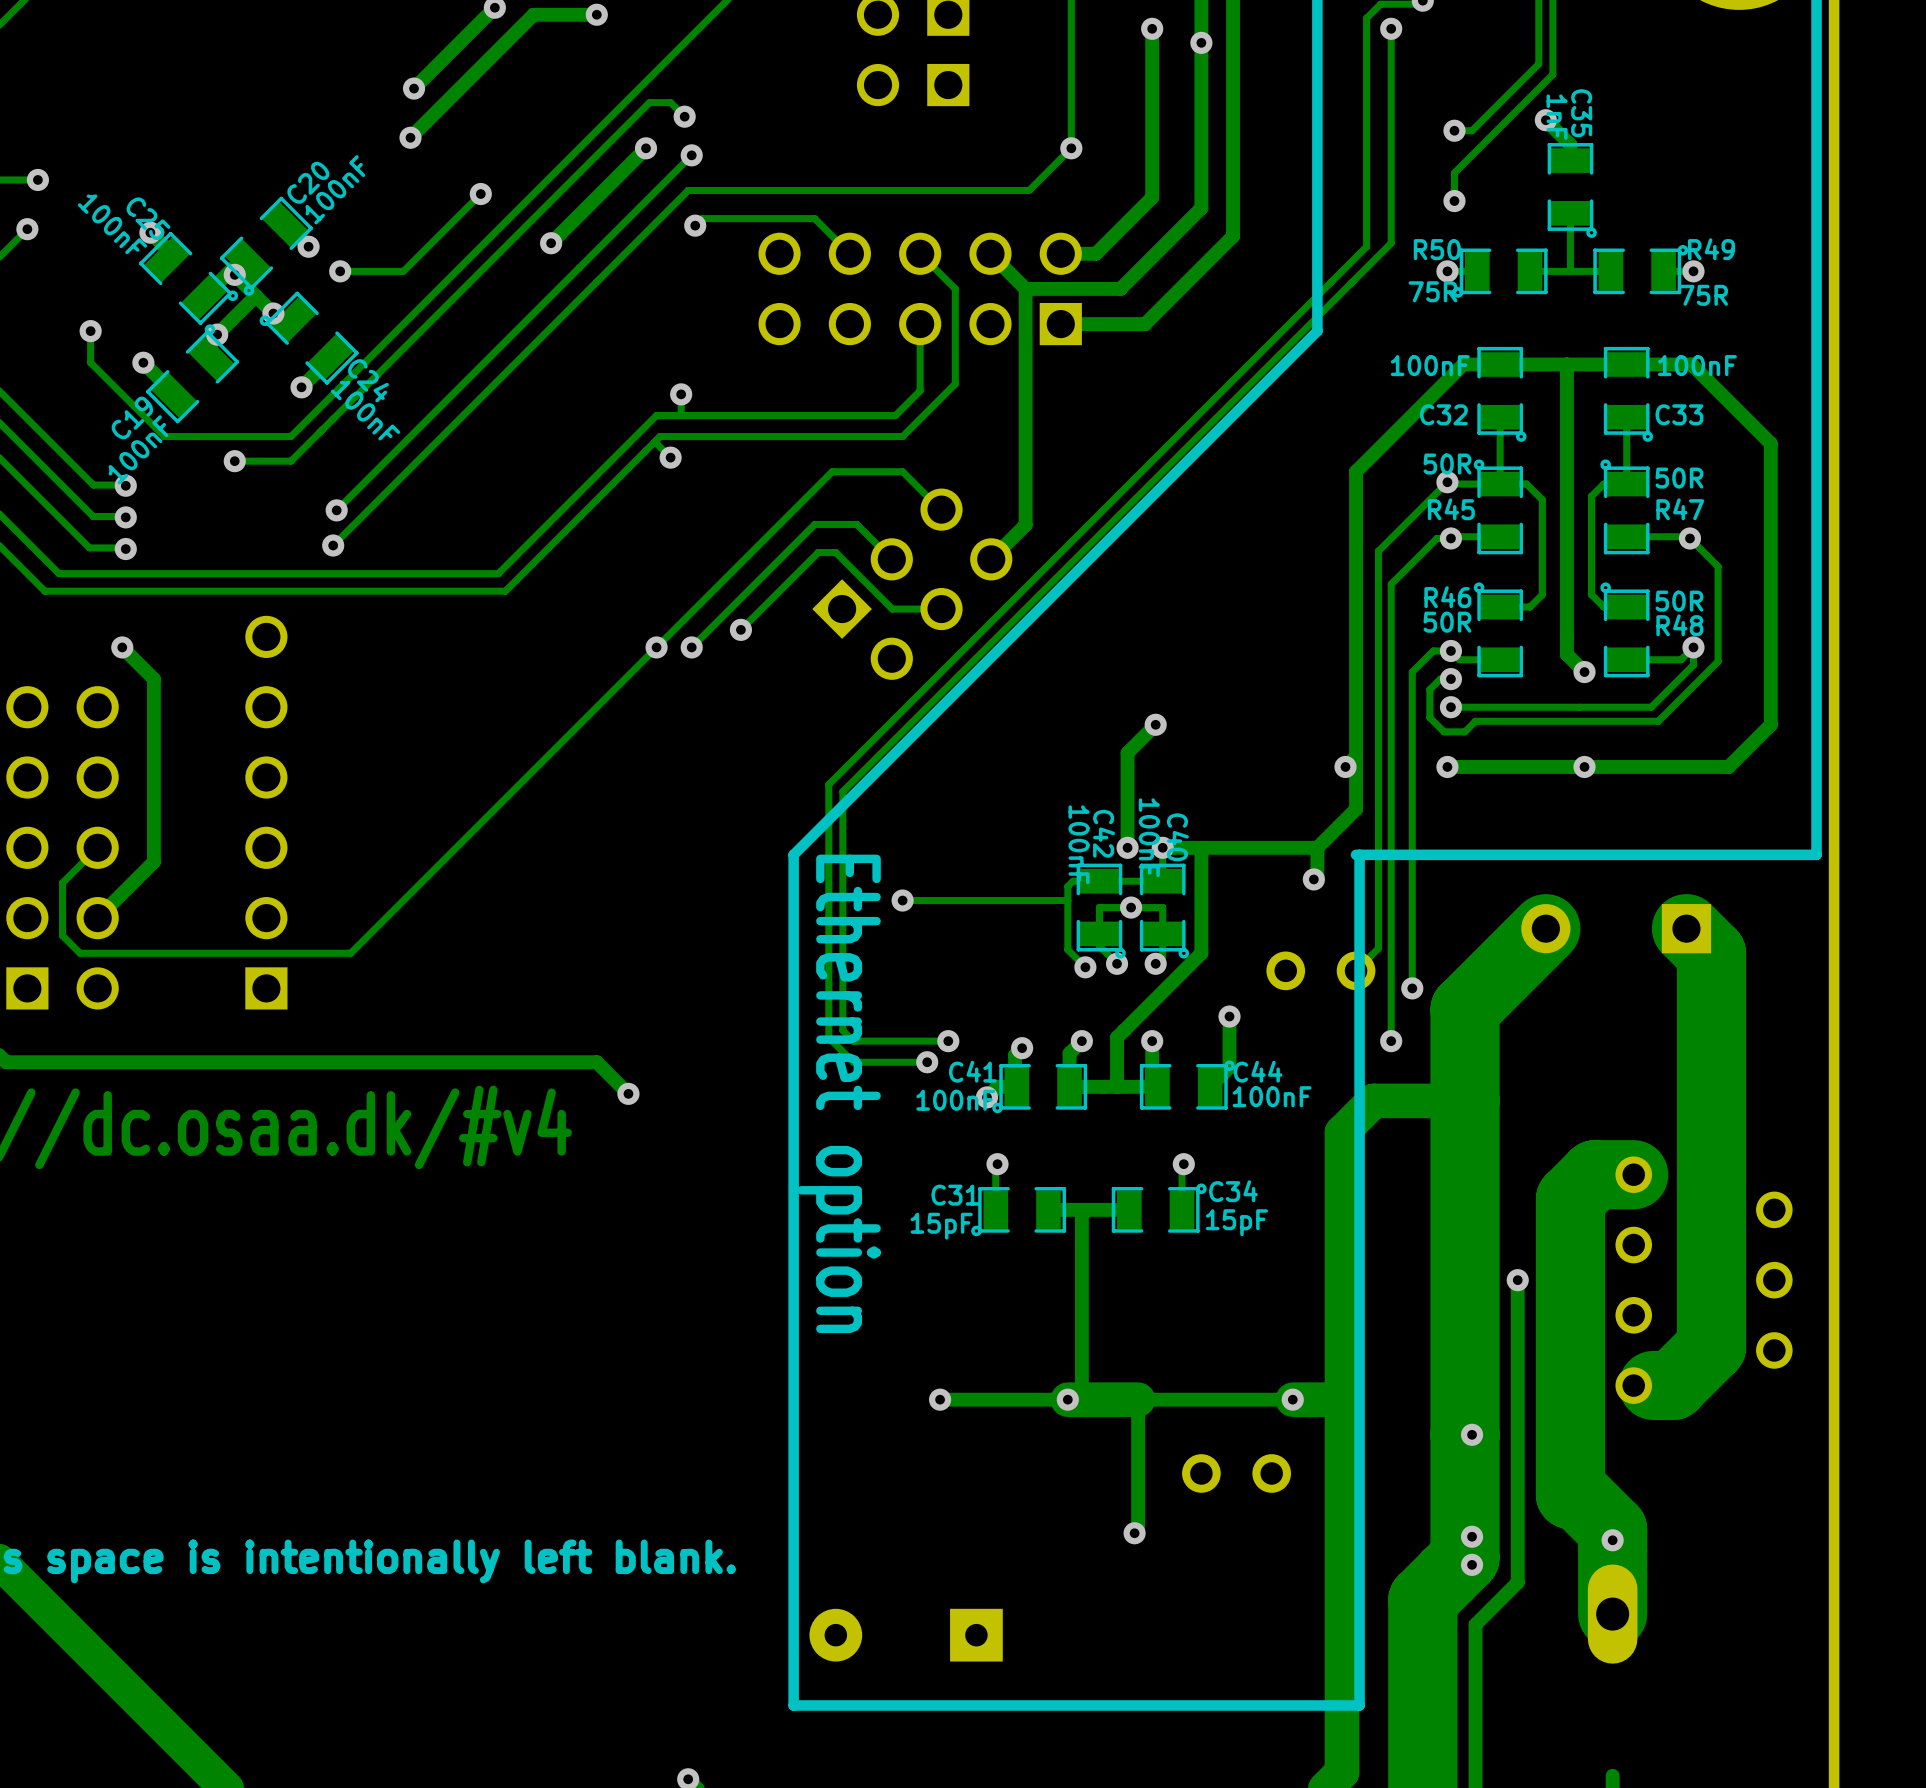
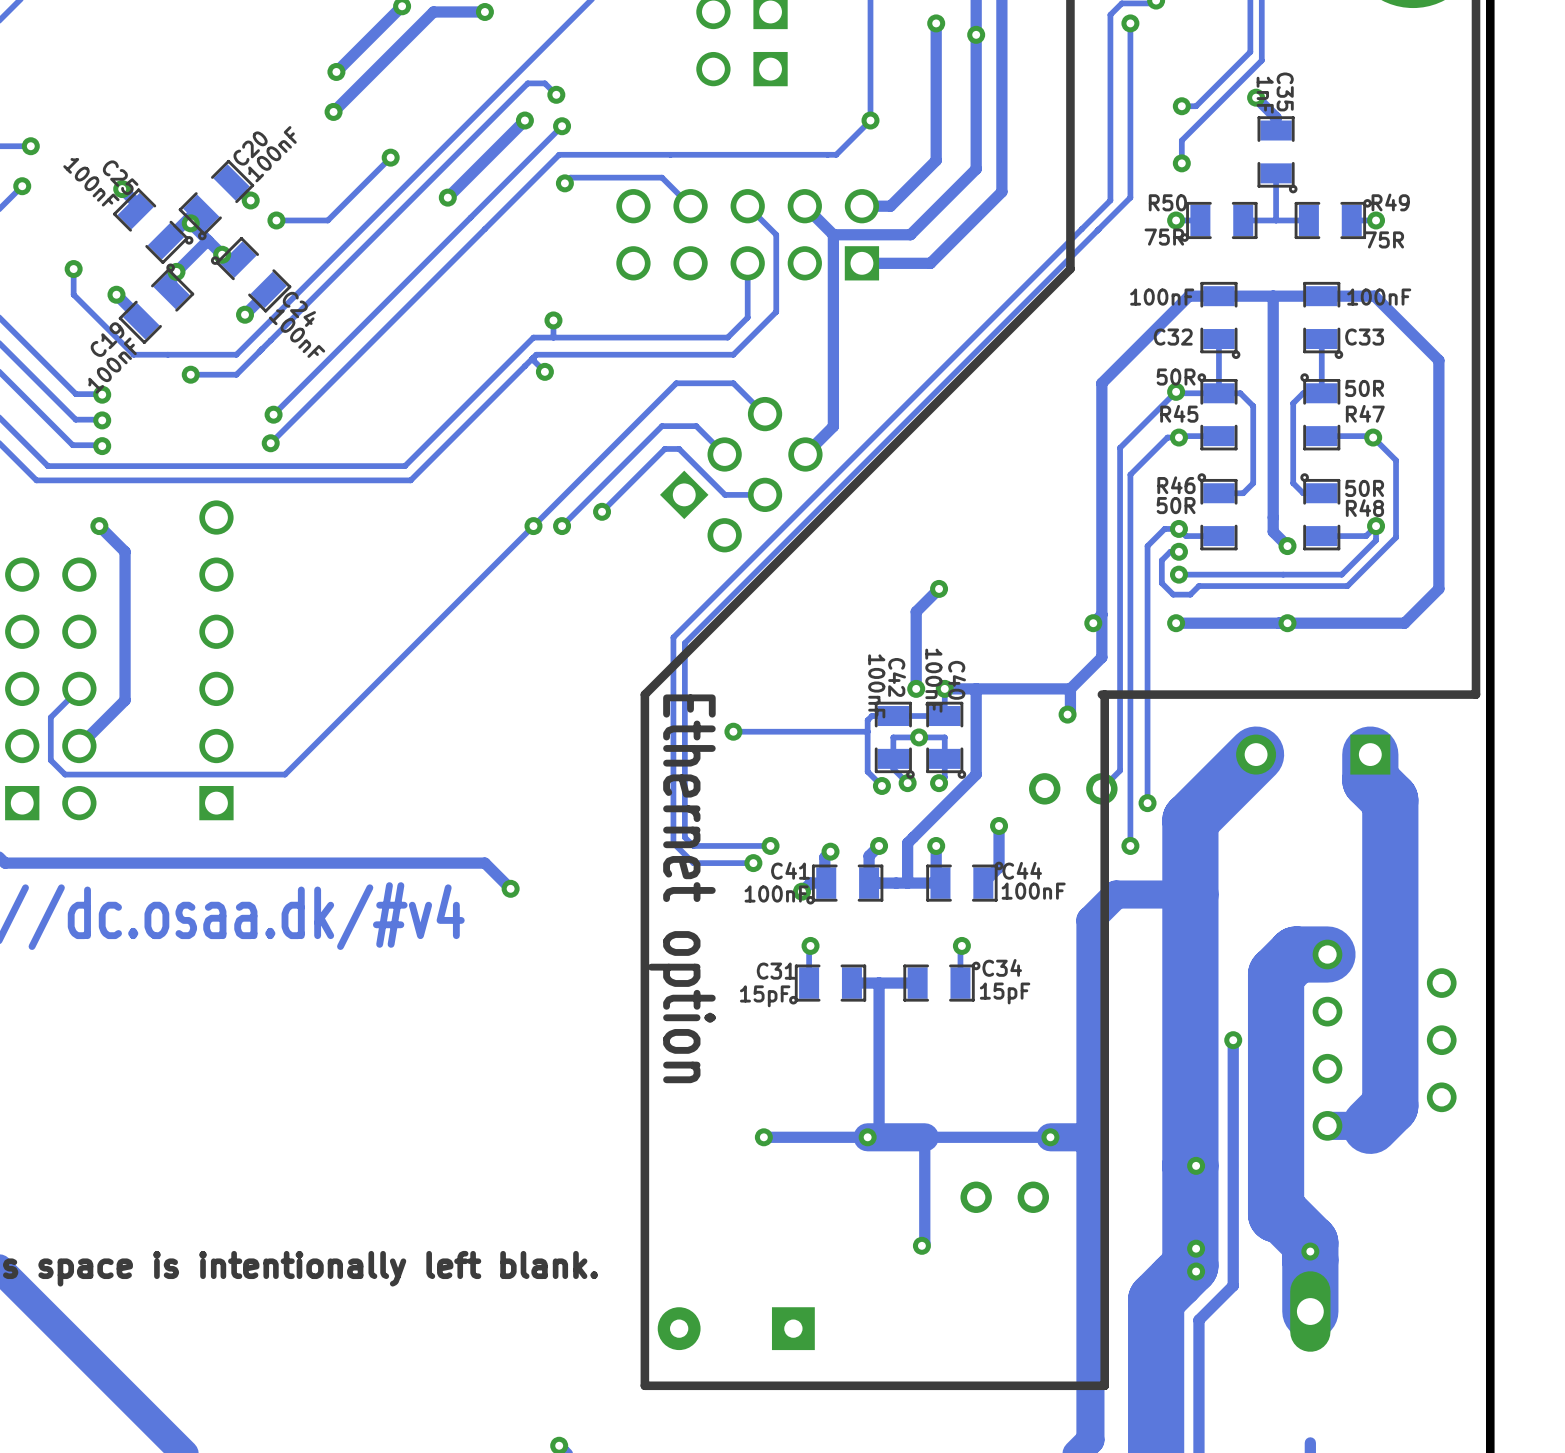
track: (1686, 928) (1711, 953) (1711, 1346) (1672, 1385) (1633, 1385) -> (1370, 754) (1370, 780) (1390, 800) (1390, 1105) (1370, 1125) (1327, 1125)

